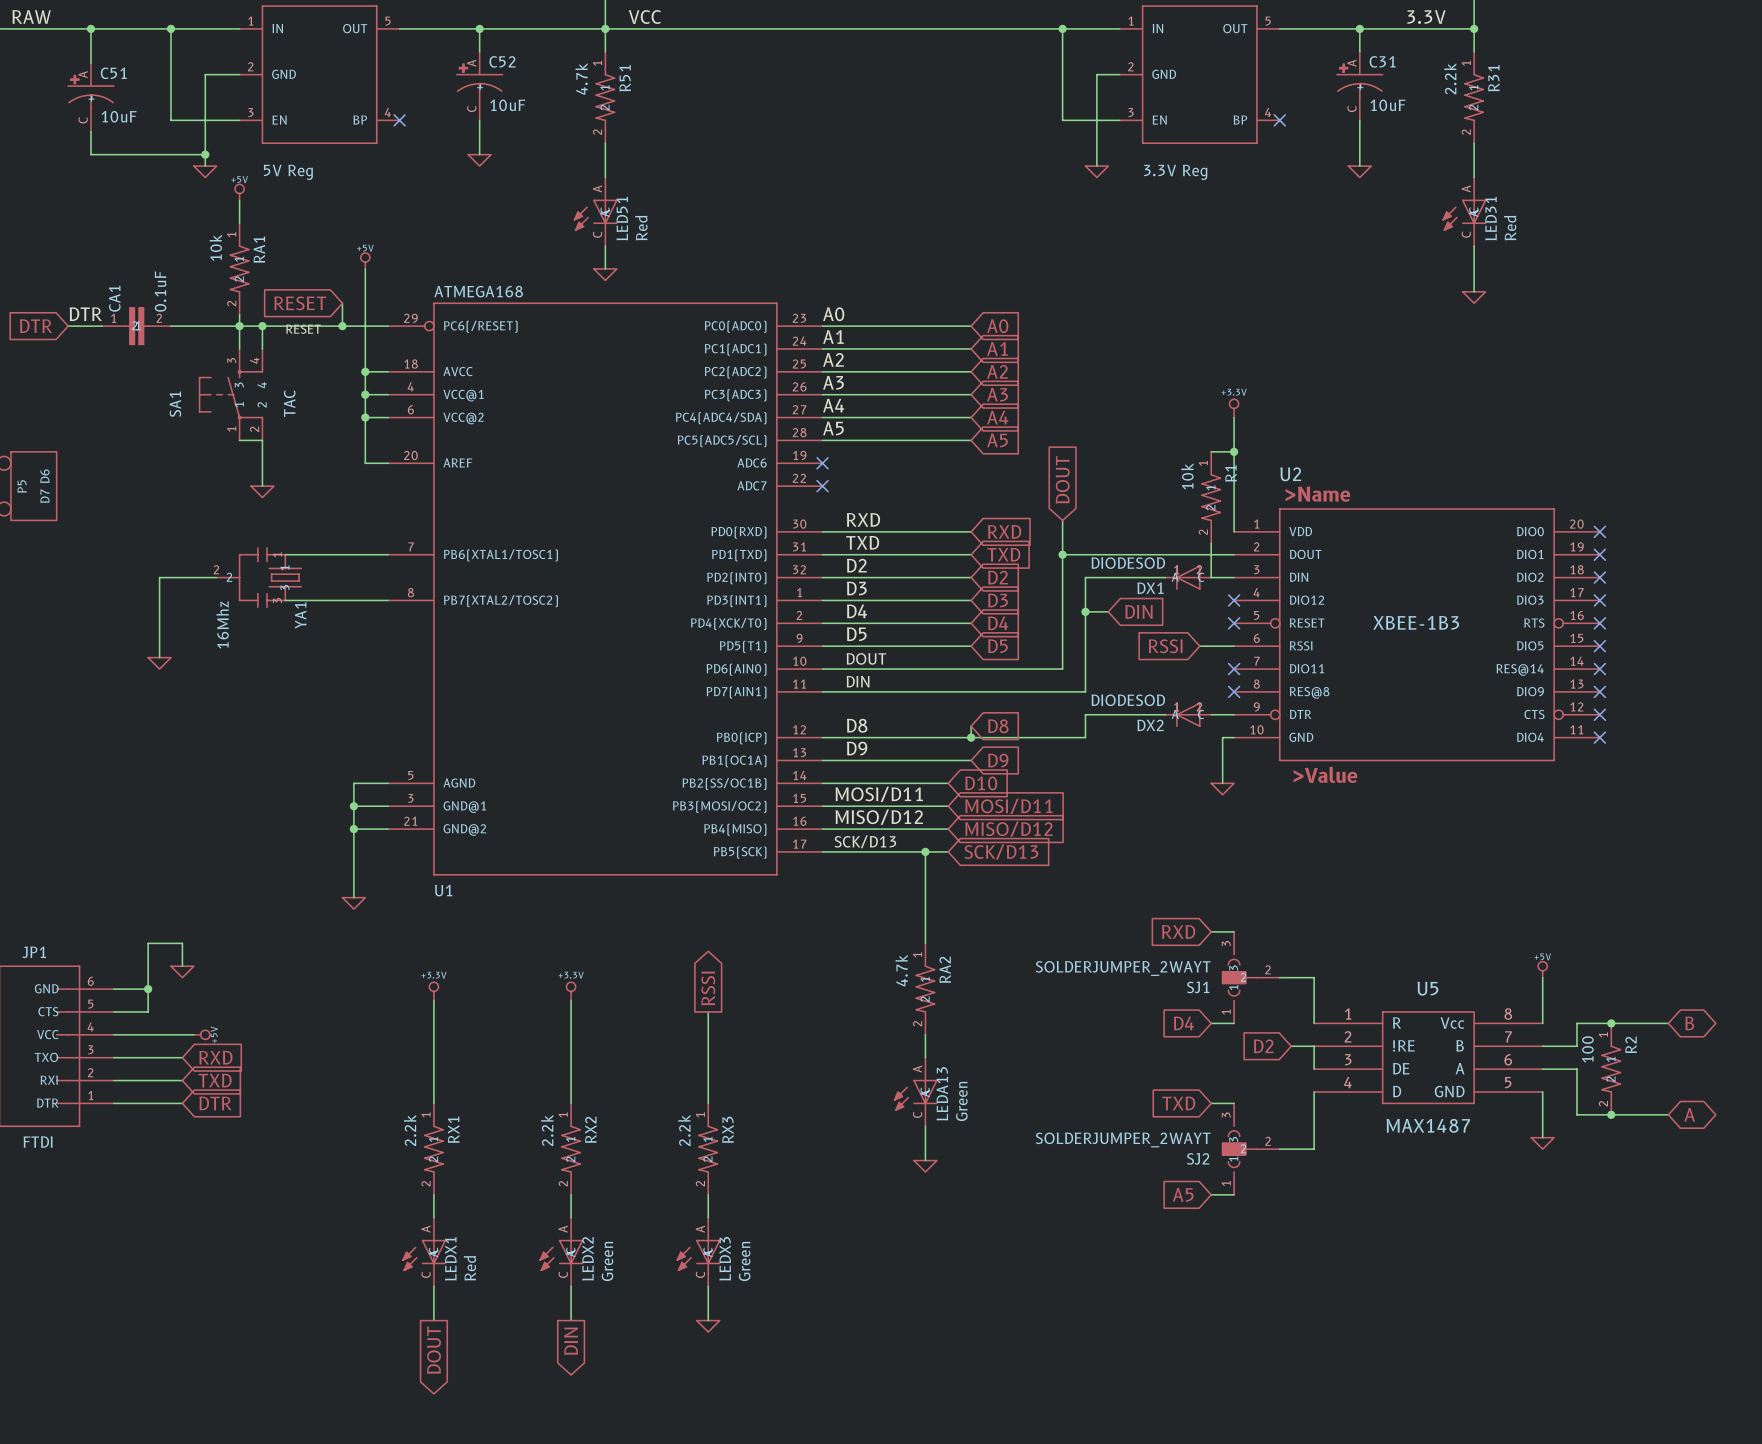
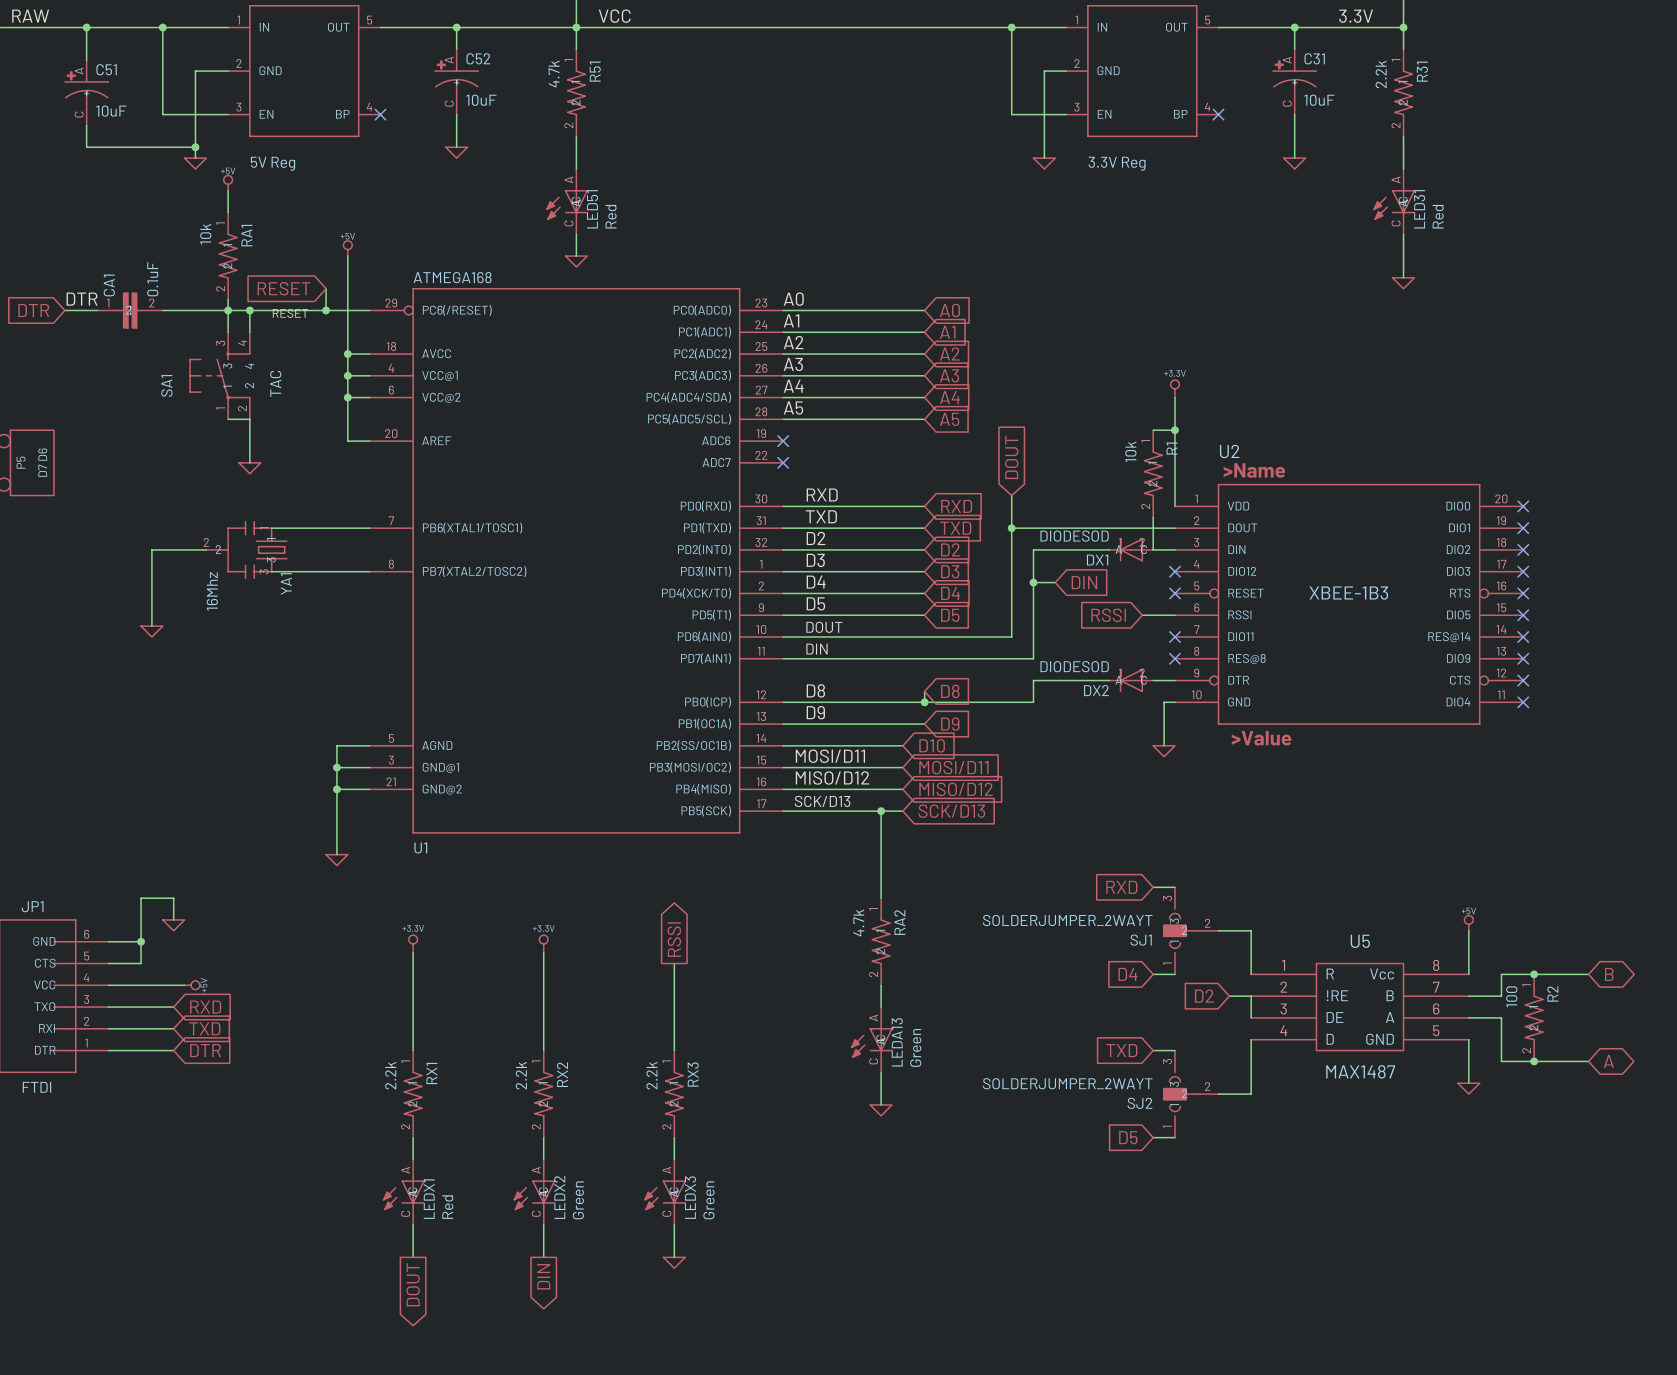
global label: A5 (1183, 1194) -> D5 (1128, 1137)

